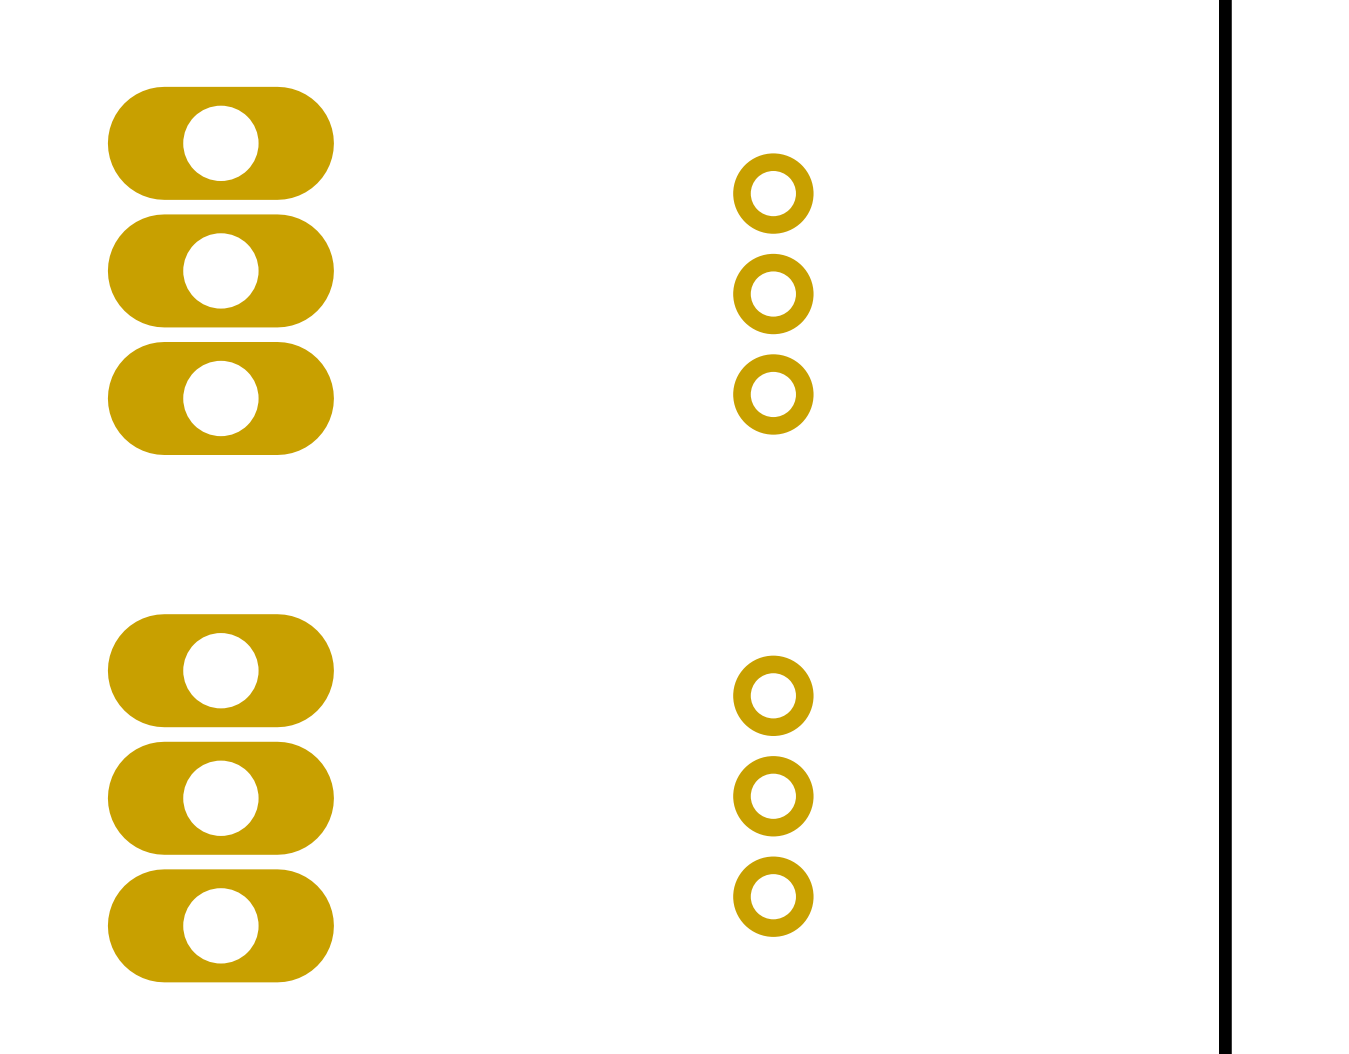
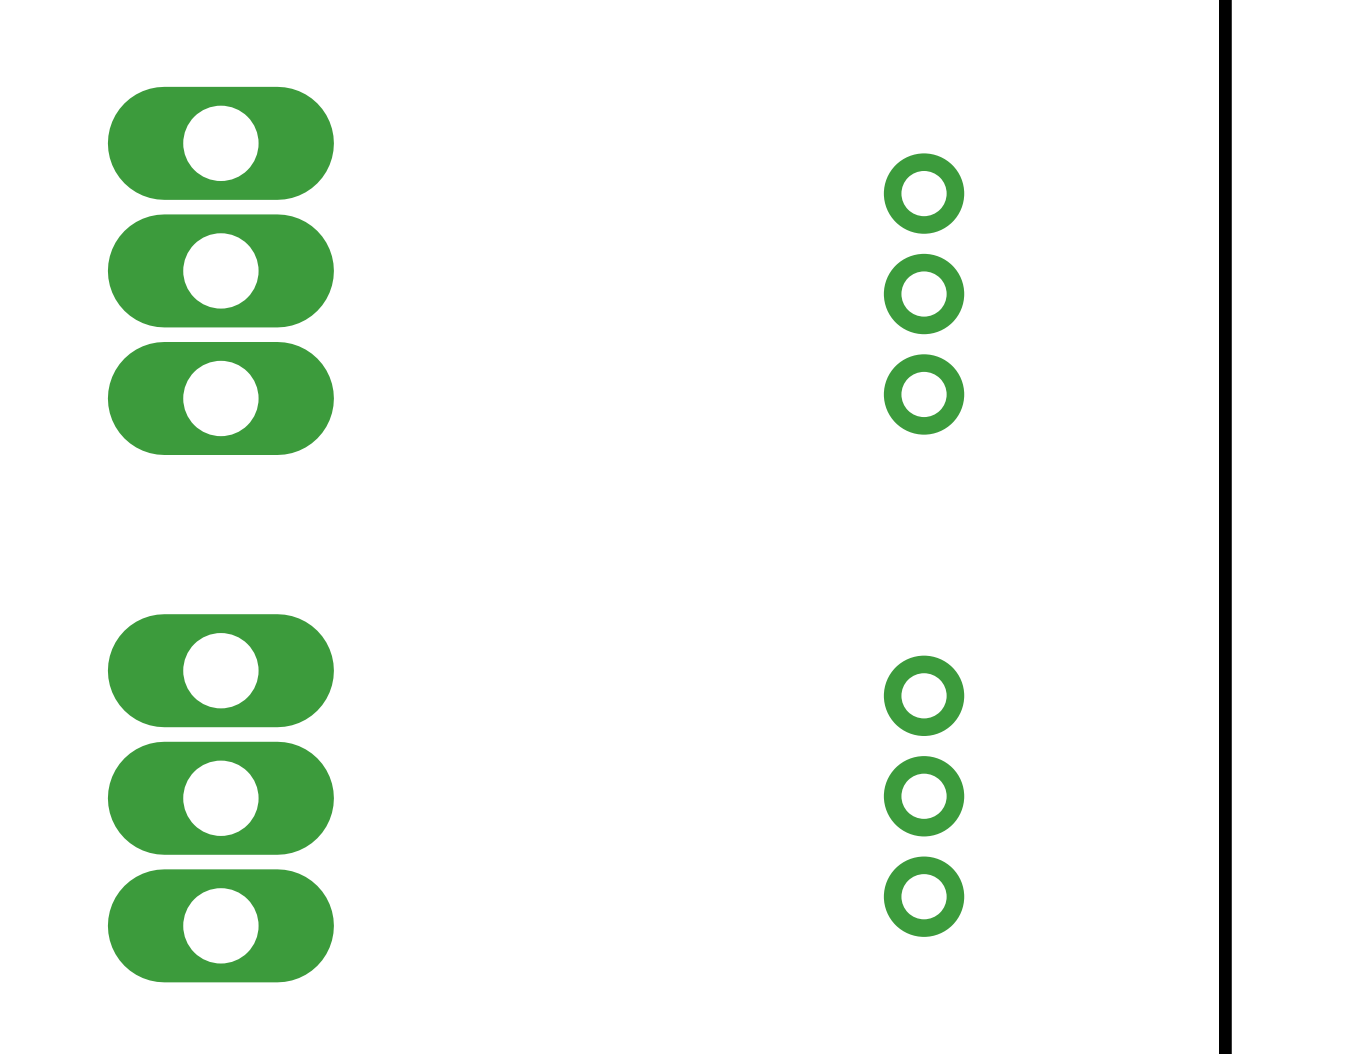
part position: (773, 294) -> (924, 294)
part position: (773, 796) -> (924, 796)

